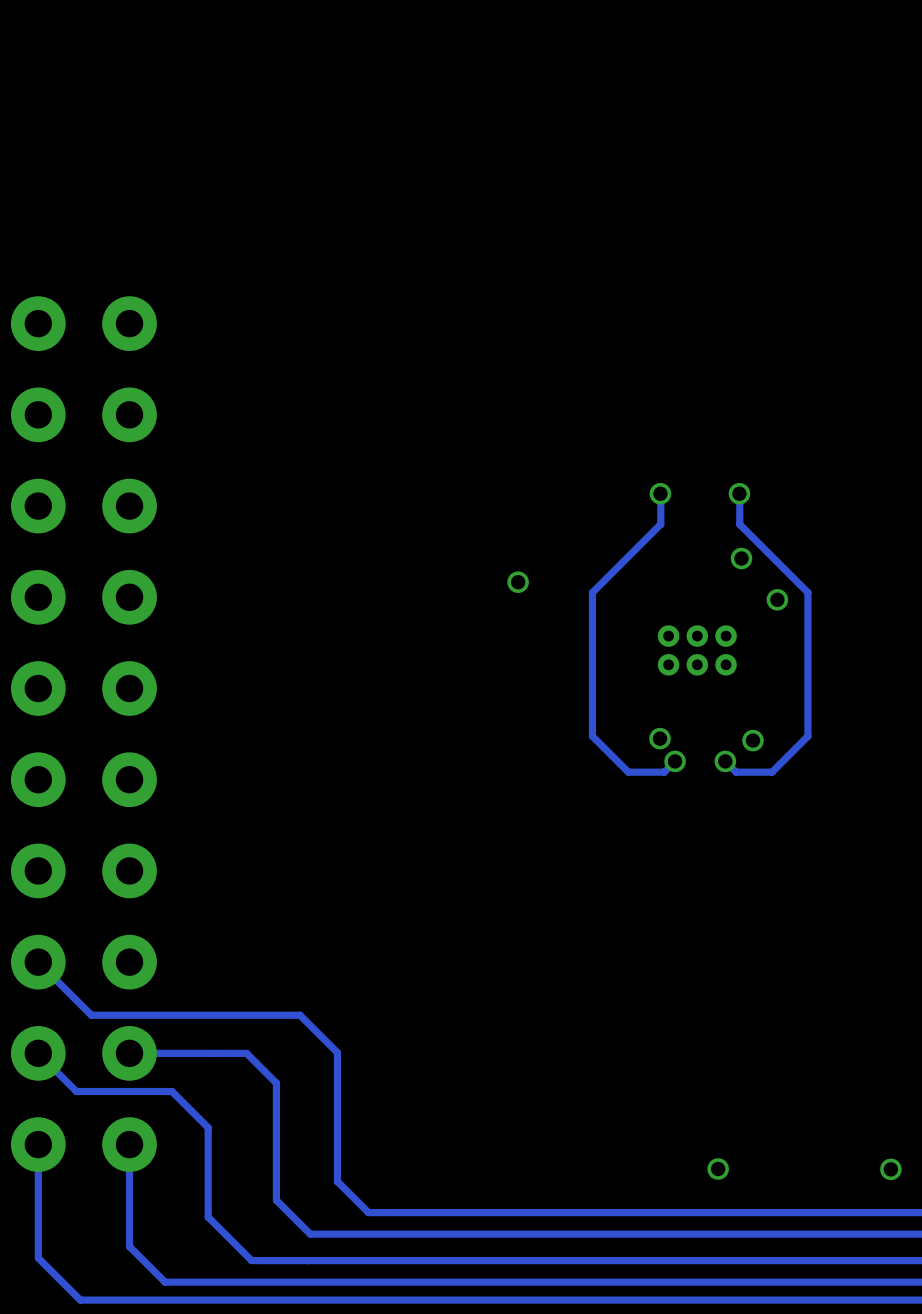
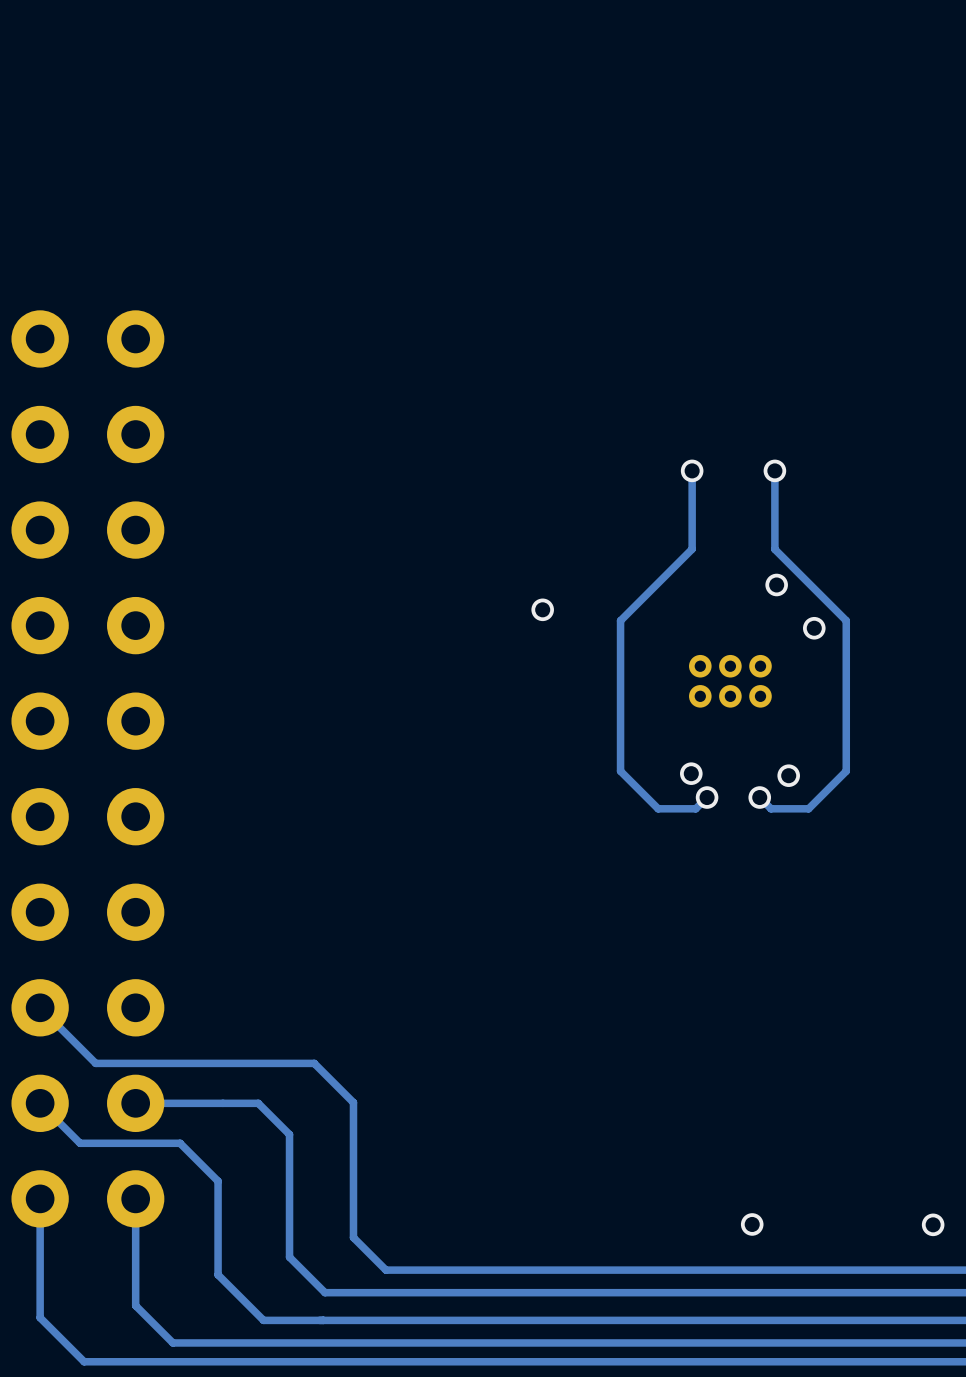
track: none -> (692, 470) (692, 517)
track: none -> (774, 470) (774, 517)
via position: (660, 493) -> (692, 470)
via position: (739, 493) -> (774, 470)

